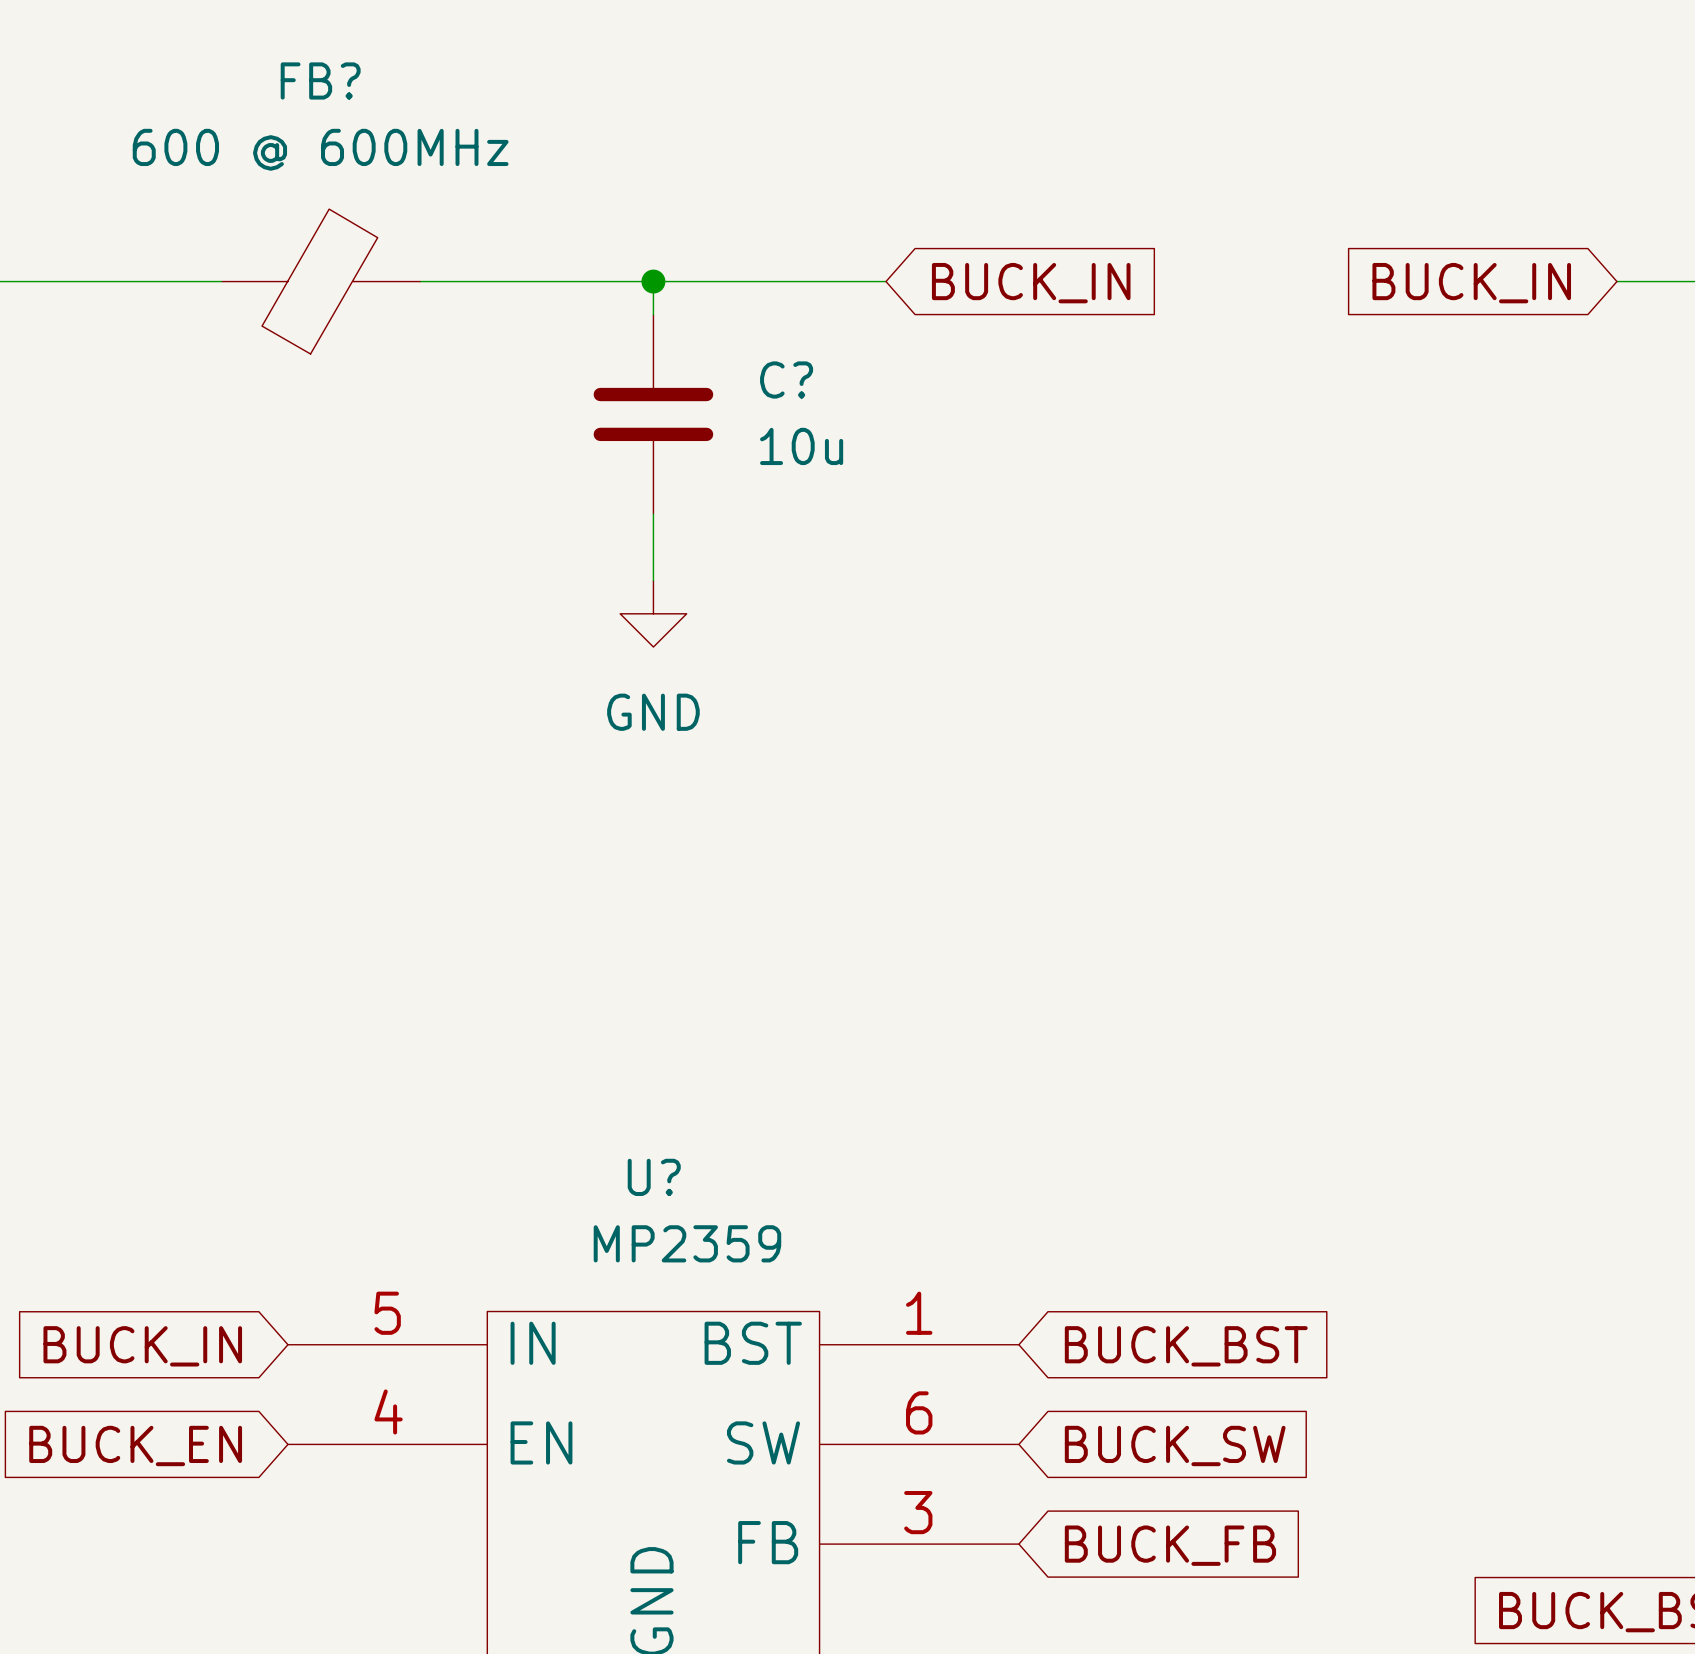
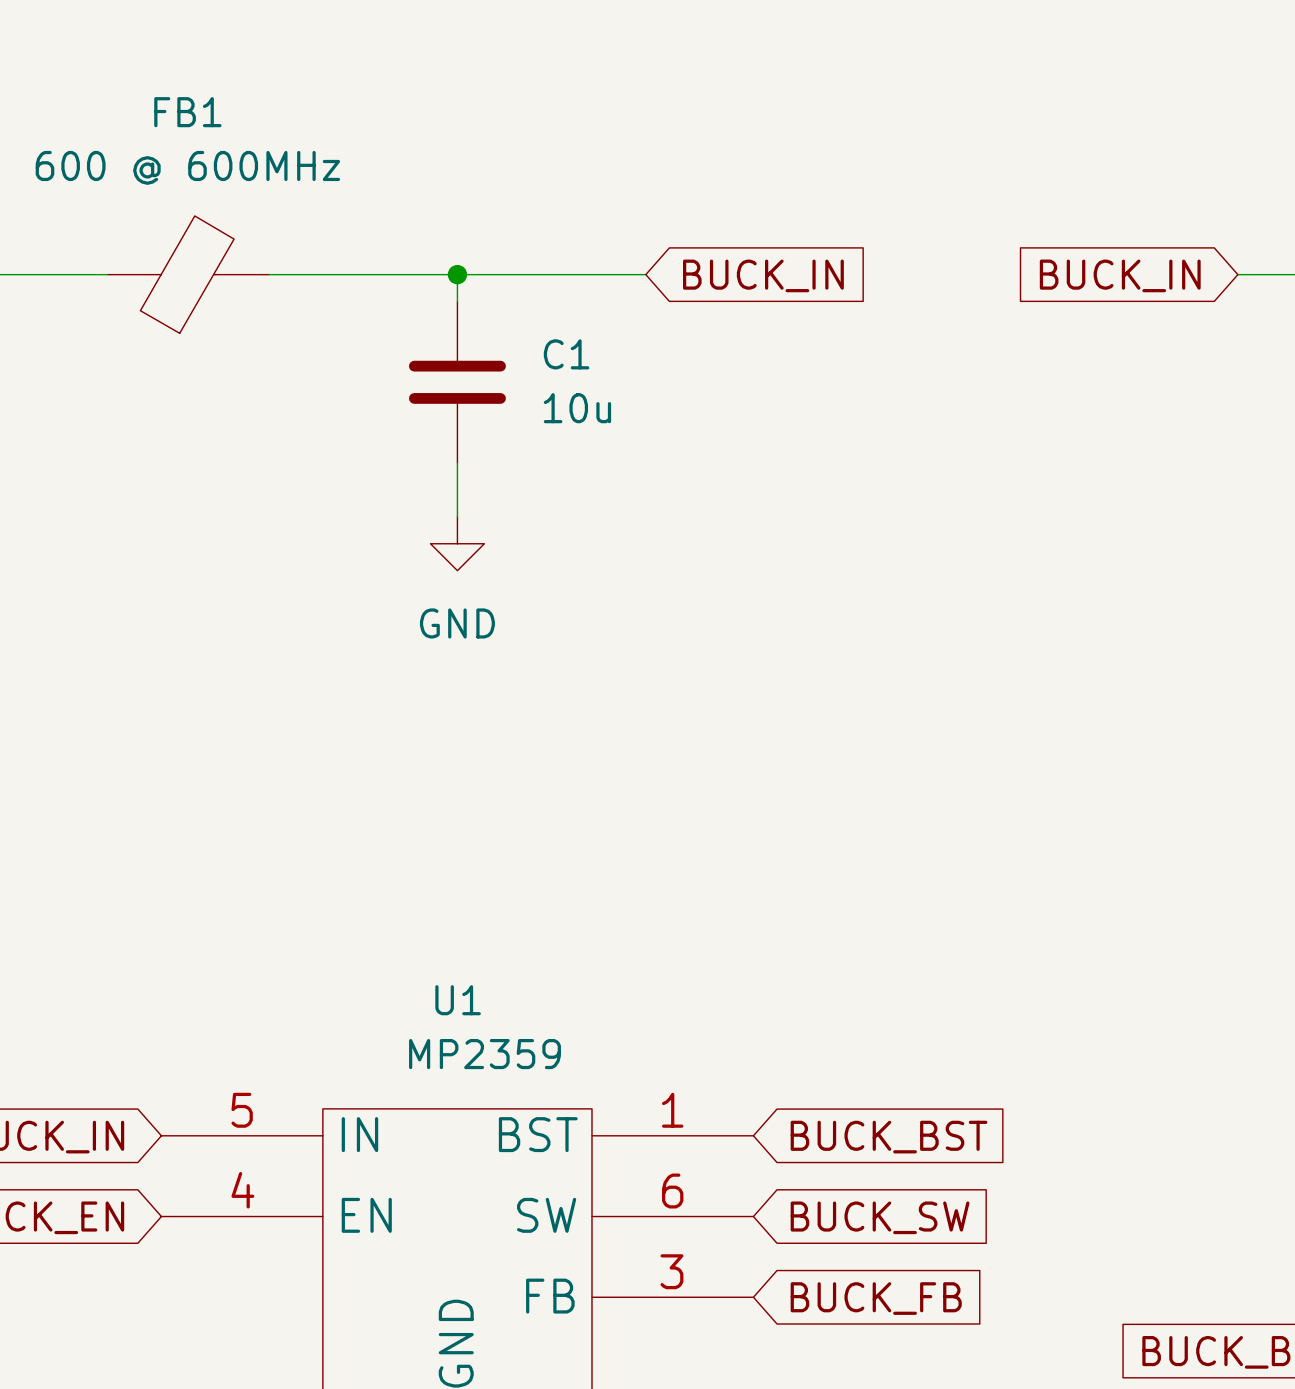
FB? name: FB? (320, 80) -> FB1 (187, 112)
C? name: C? (786, 379) -> C1 (566, 354)
U? name: U? (654, 1177) -> U1 (458, 1000)

